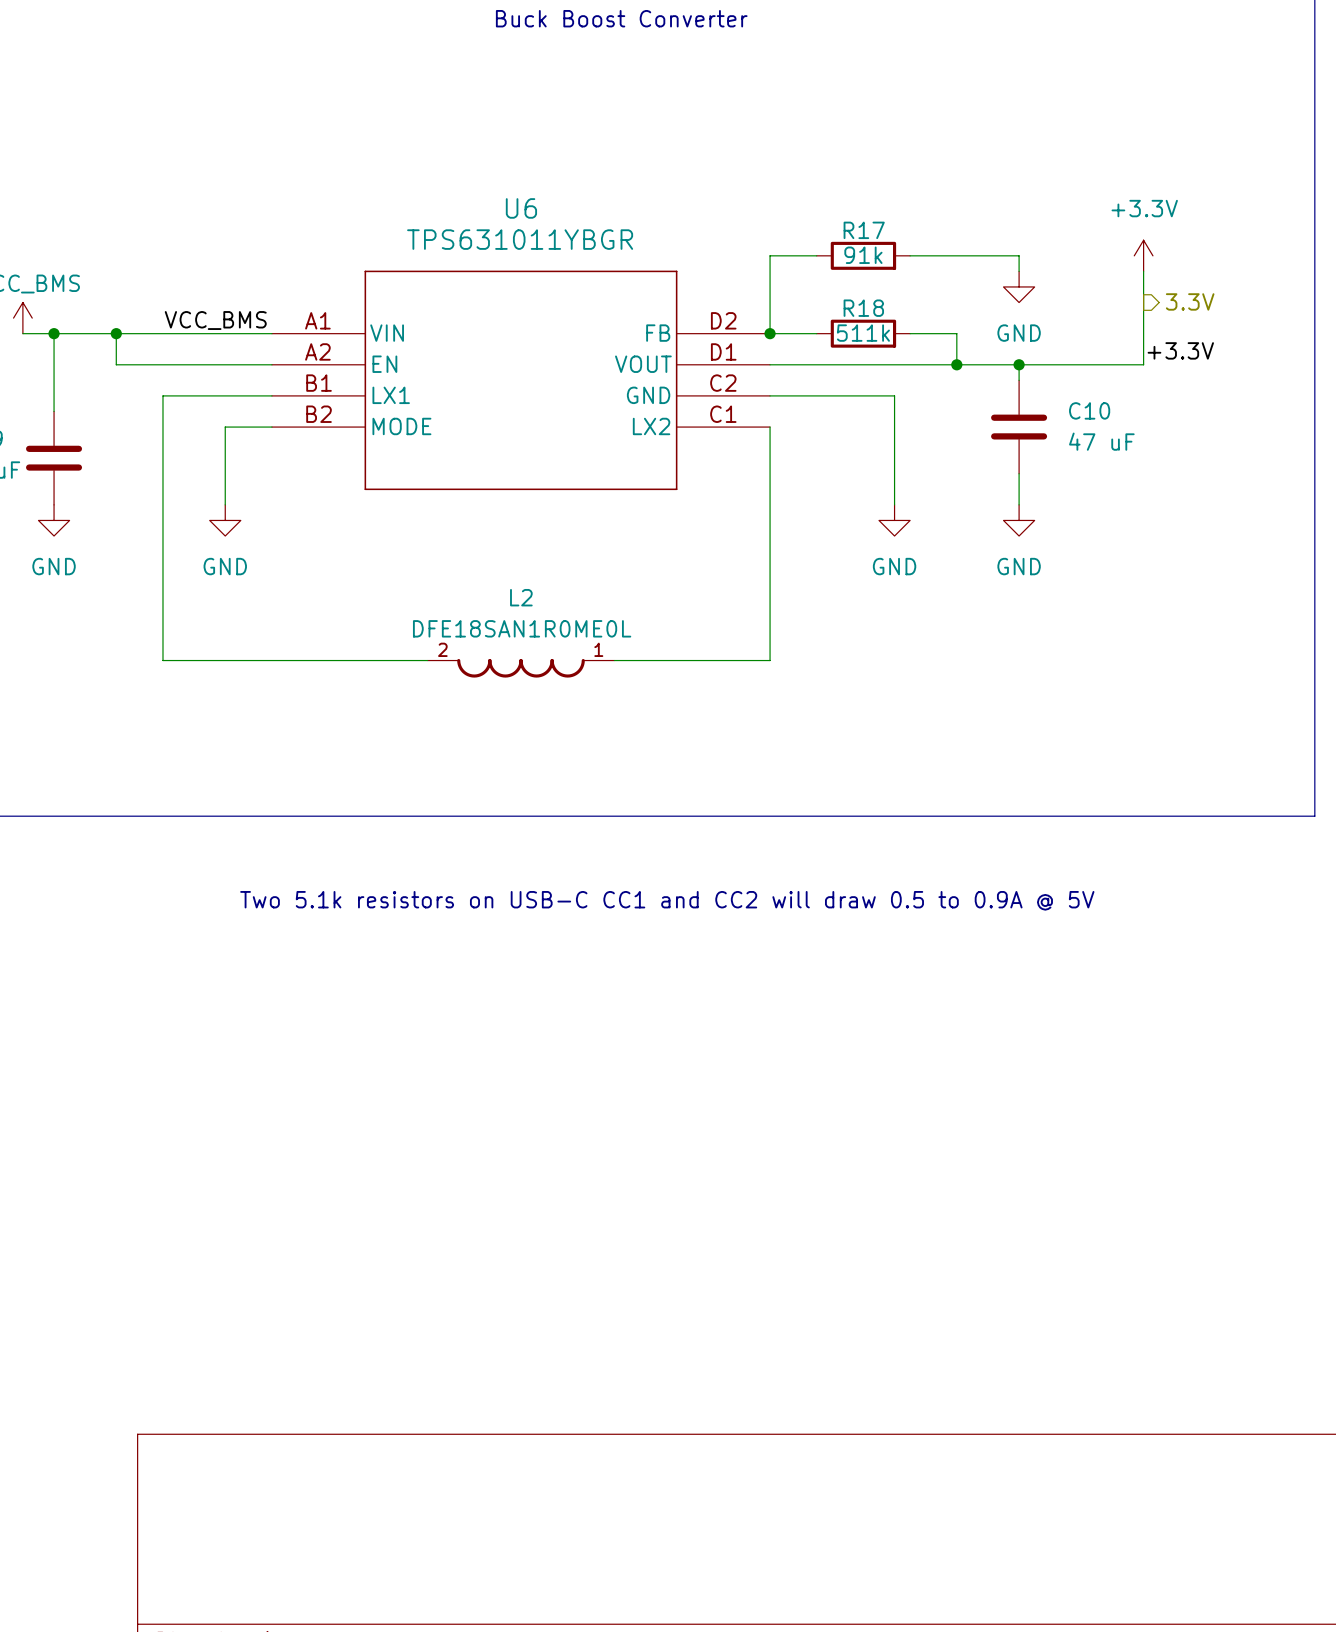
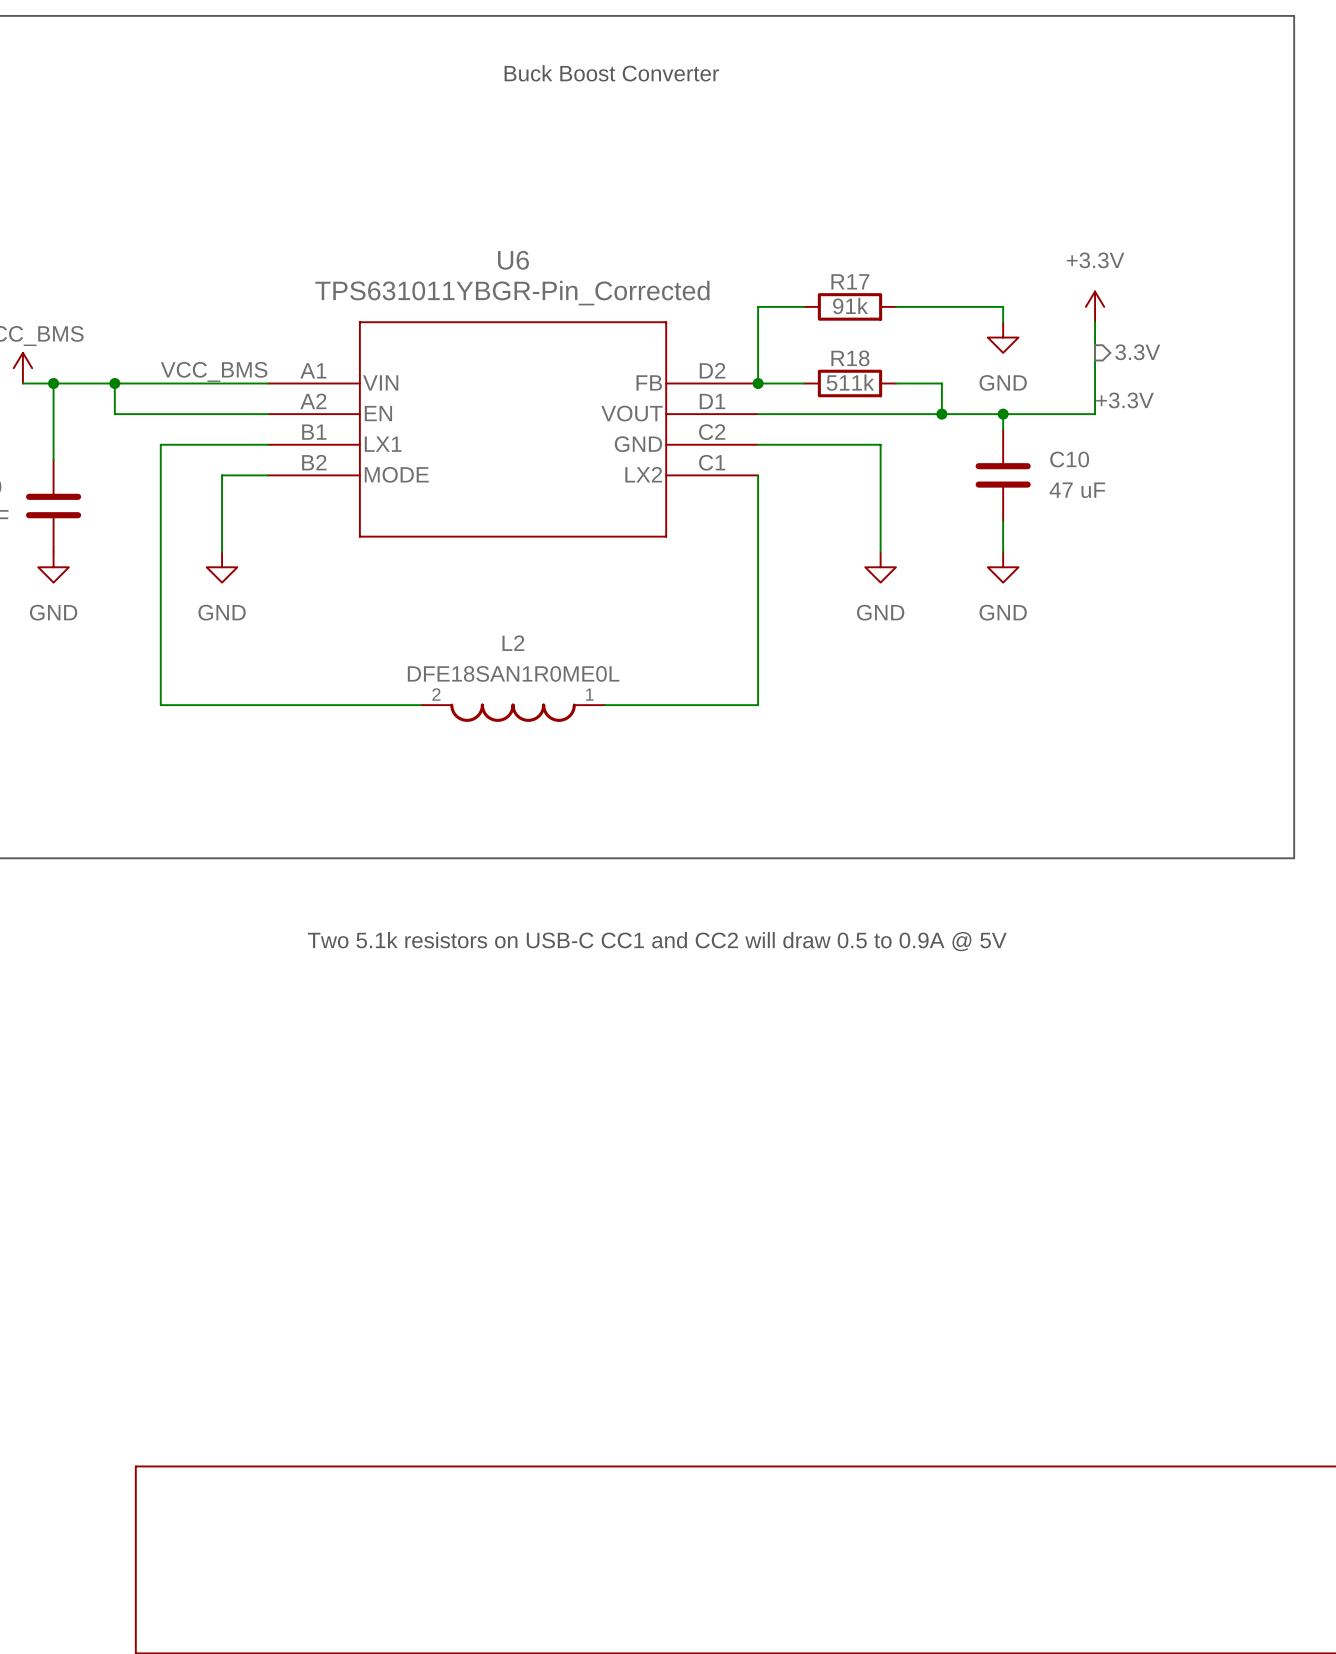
U6 value: TPS631011YBGR (520, 239) -> TPS631011YBGR-Pin_Corrected (512, 293)
power symbol position: +3.3V (1143, 255) -> +3.3V (1095, 306)
wire: (1143, 271) (1143, 364) (1112, 364) -> (1095, 322) (1095, 414)
hierarchical label position: 3.3V (1190, 301) -> 3.3V (1137, 352)
label position: +3.3V (1180, 350) -> +3.3V (1124, 400)

